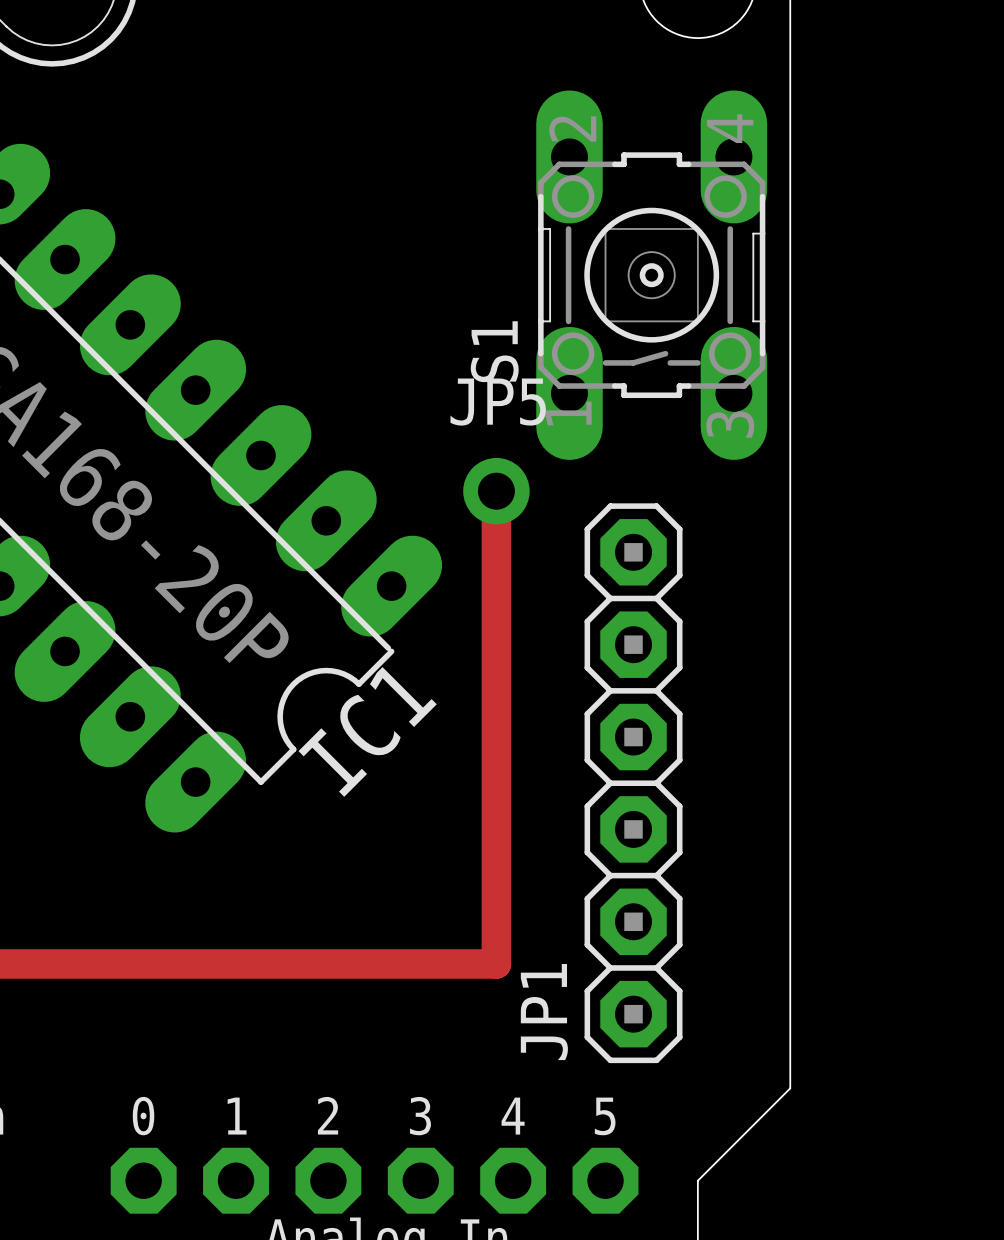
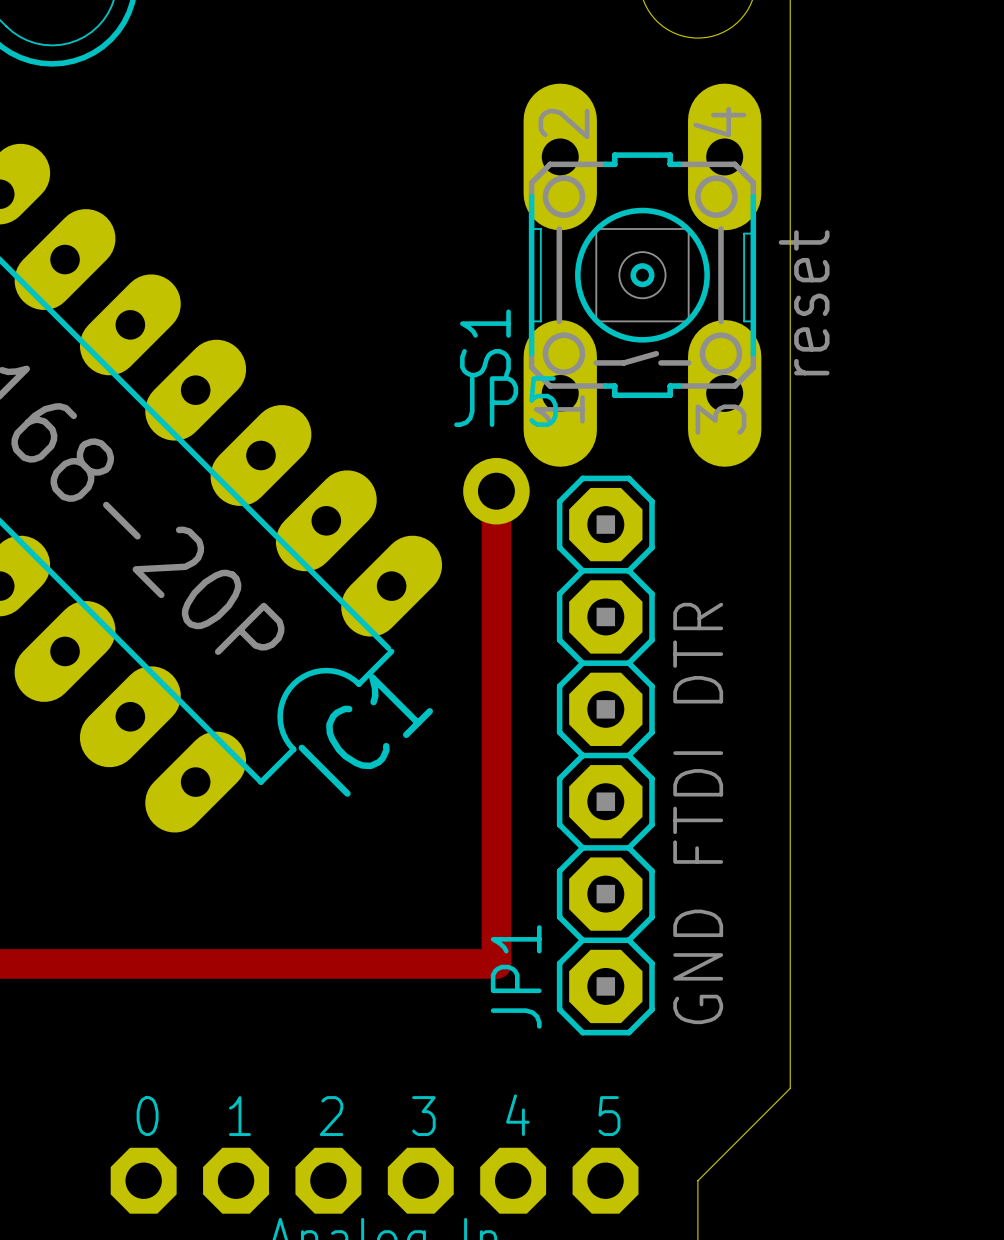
S1 footprint: [536, 90, 768, 460] -> [523, 83, 762, 467]
S1 value: none -> reset (804, 302)
JP1 footprint: [584, 503, 683, 1064] -> [556, 475, 655, 1036]
JP1 value: none -> GND FTDI DTR (698, 813)

